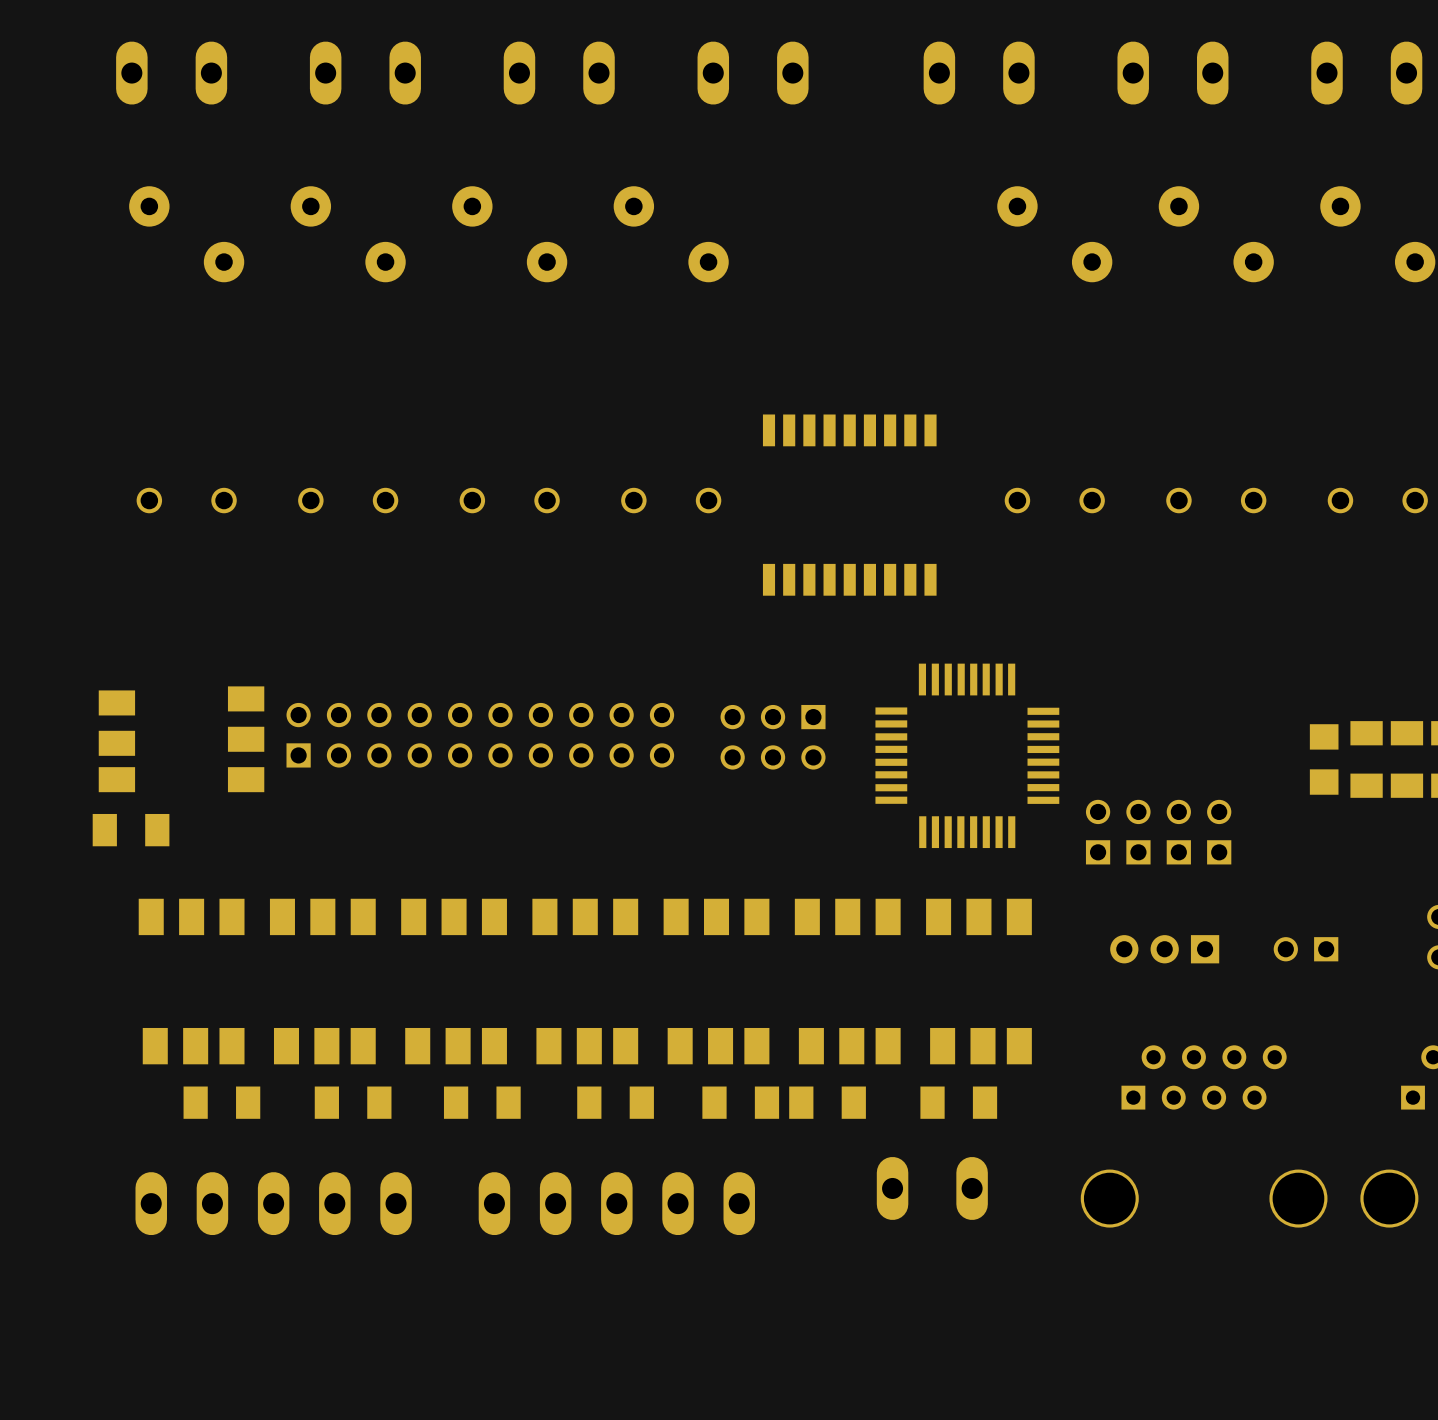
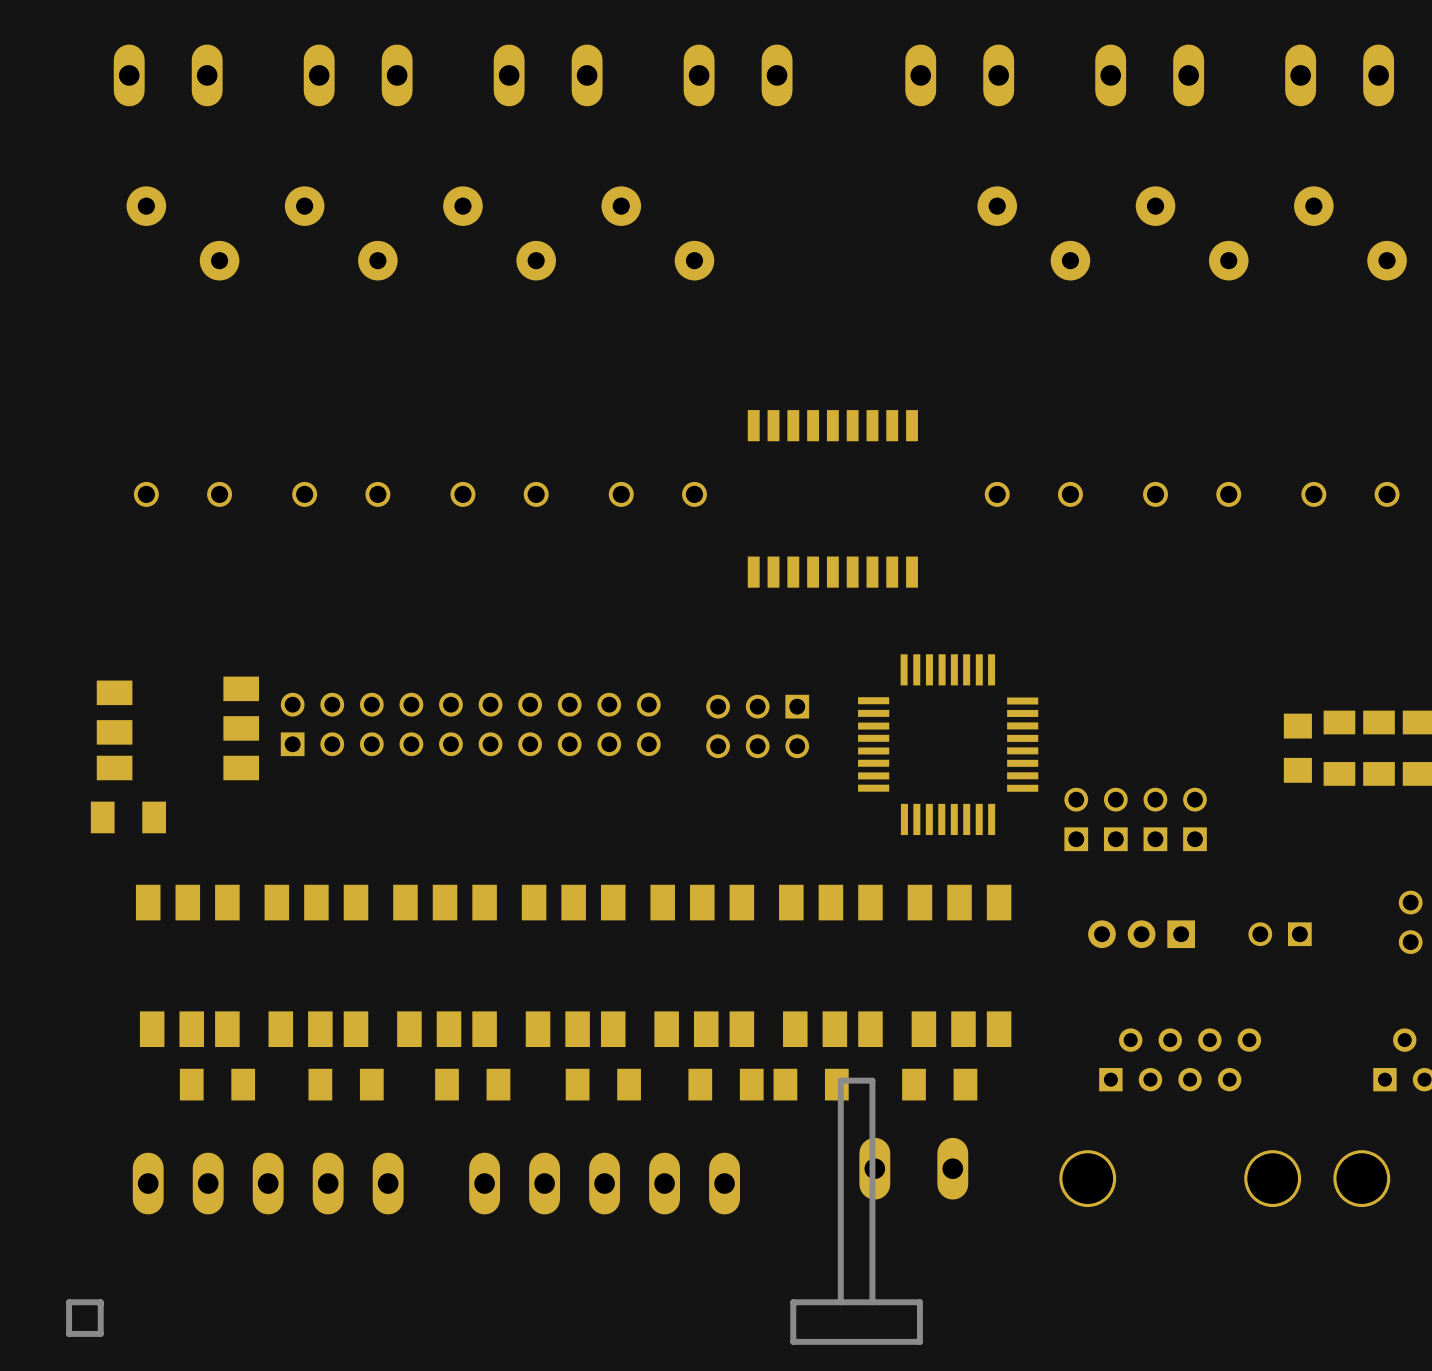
line: none -> (69, 1302) (100, 1302) (100, 1333) (69, 1333) (69, 1302)
line: none -> (793, 1302) (919, 1302) (919, 1341) (793, 1341) (793, 1302)
line: none -> (840, 1302) (840, 1080) (872, 1080) (872, 1302)

